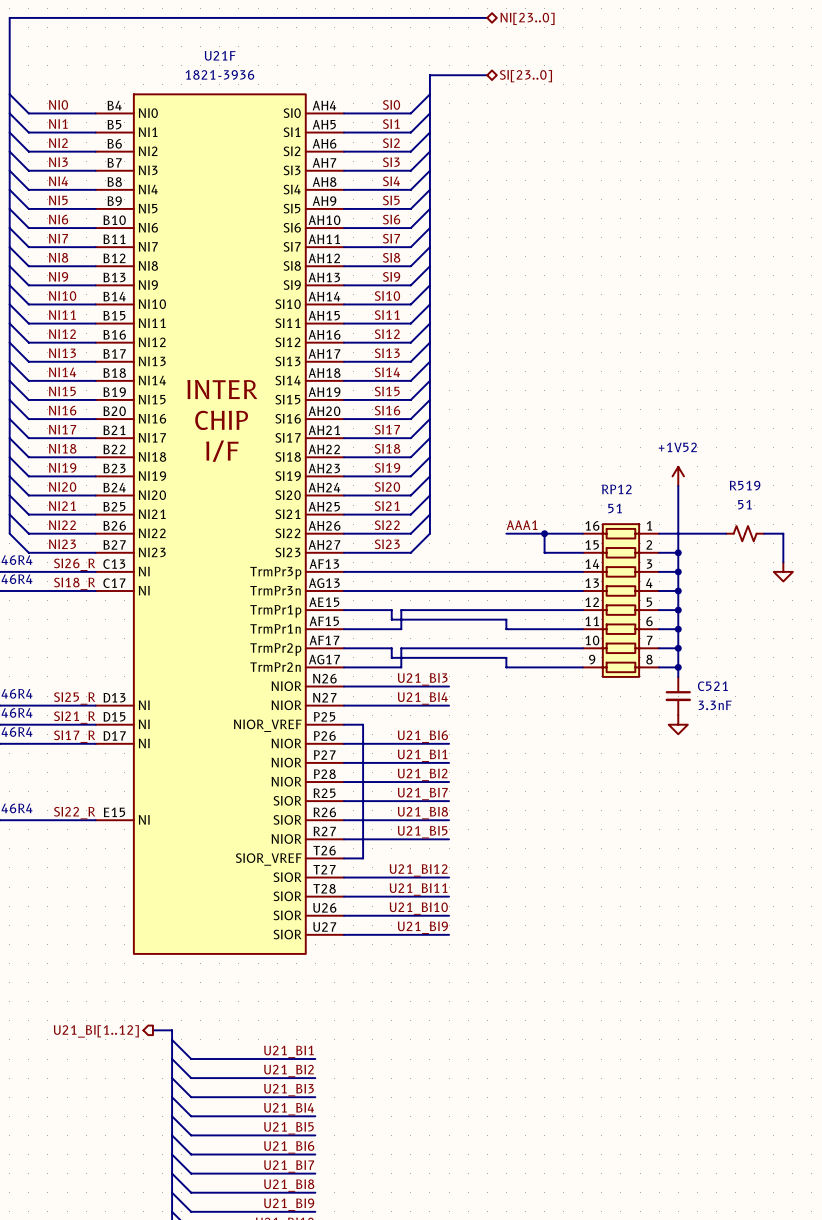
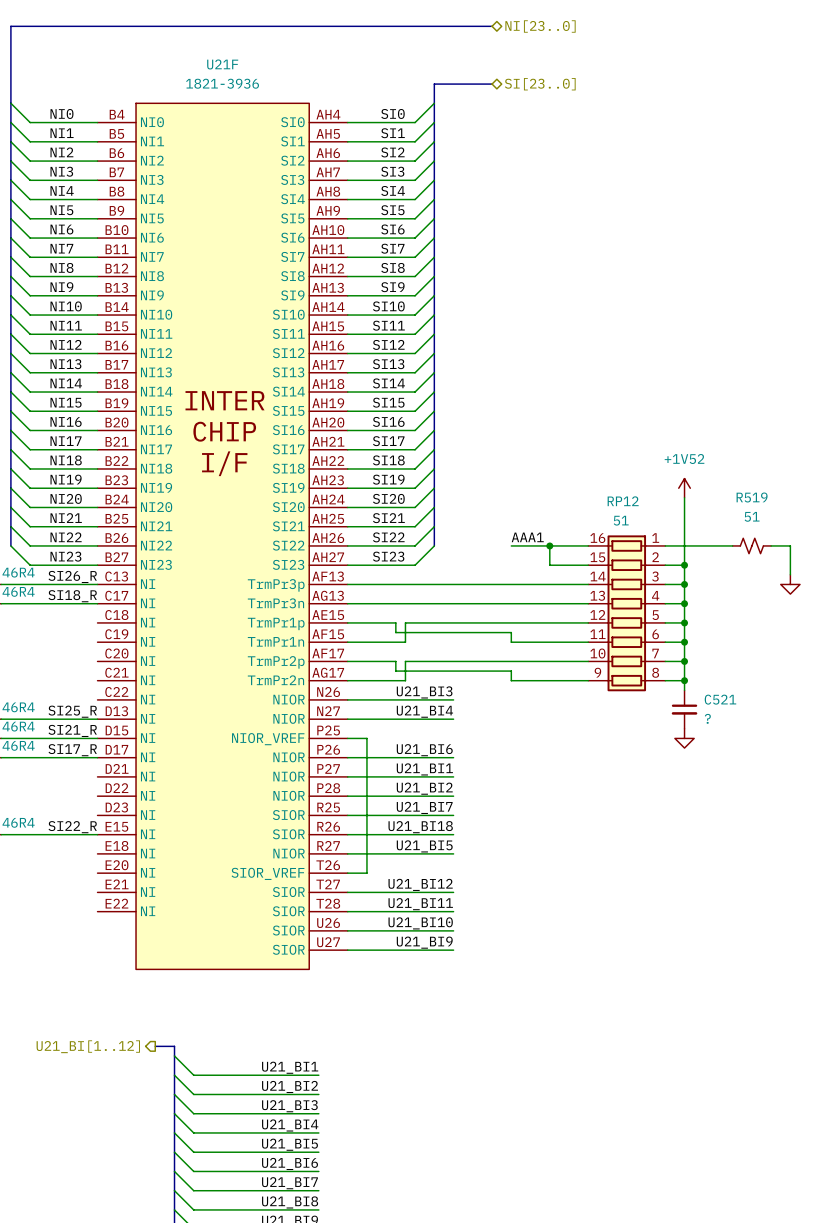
U21F symbol: [95, 94, 344, 954] -> [97, 103, 348, 970]
C521 value: 3.3nF (715, 705) -> ? (707, 718)
label: U21_BI8 (422, 813) -> U21_BI18 (420, 827)

